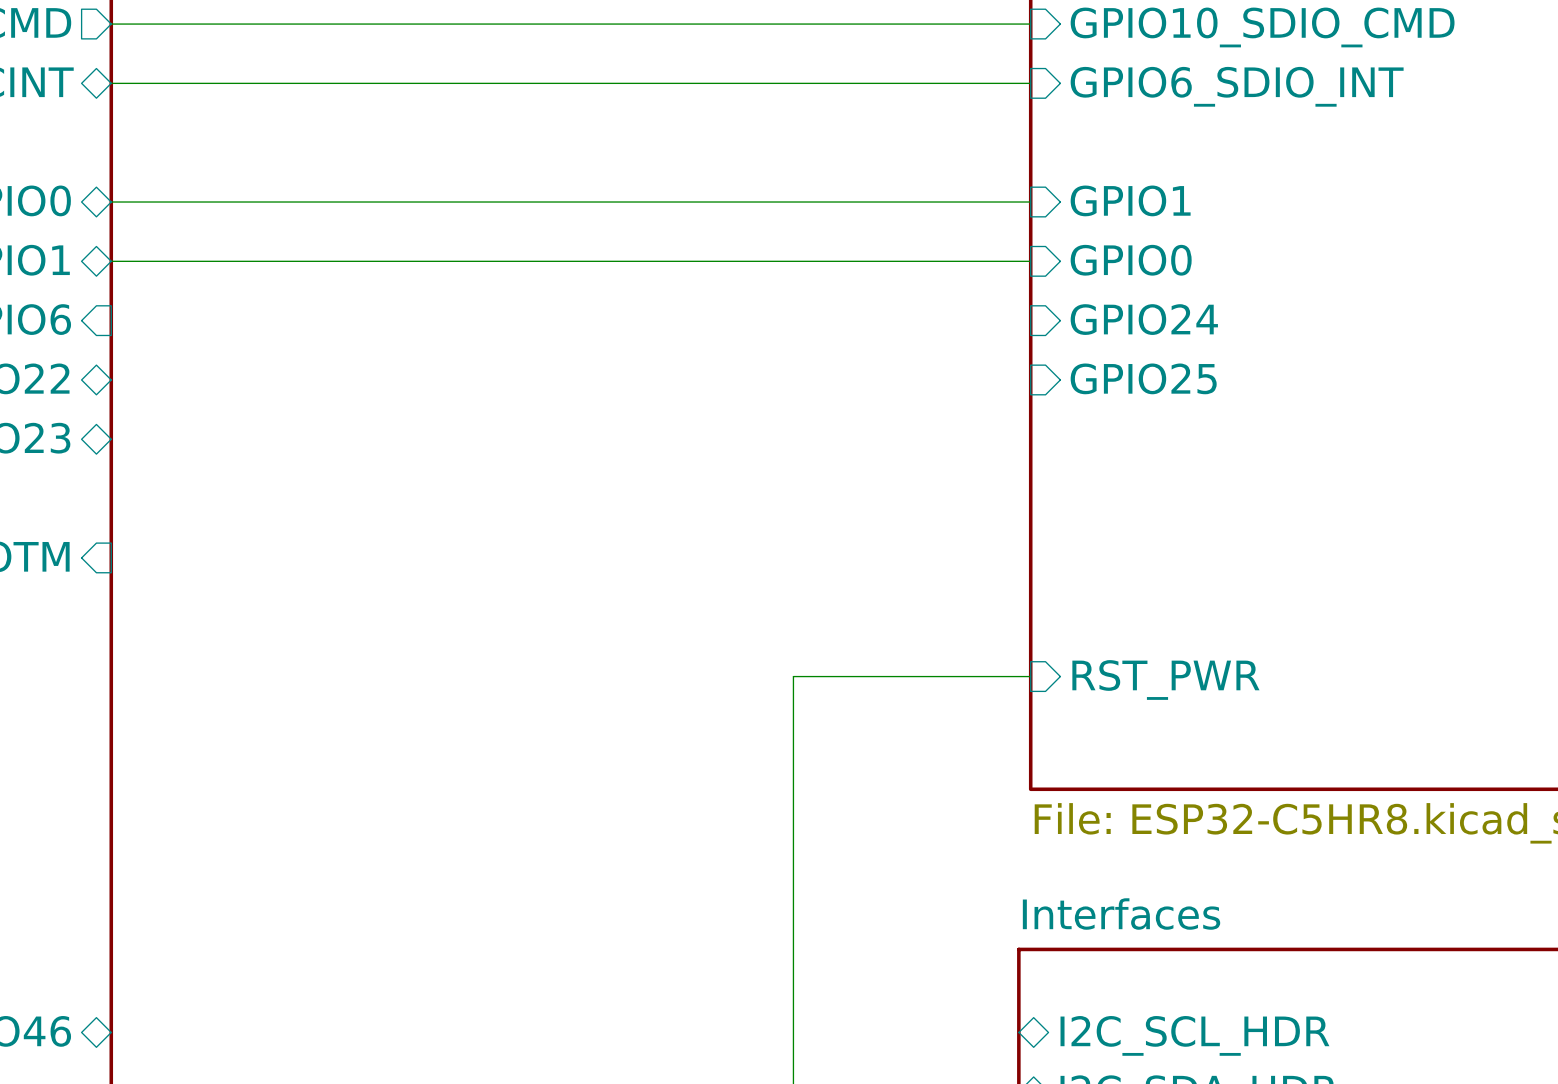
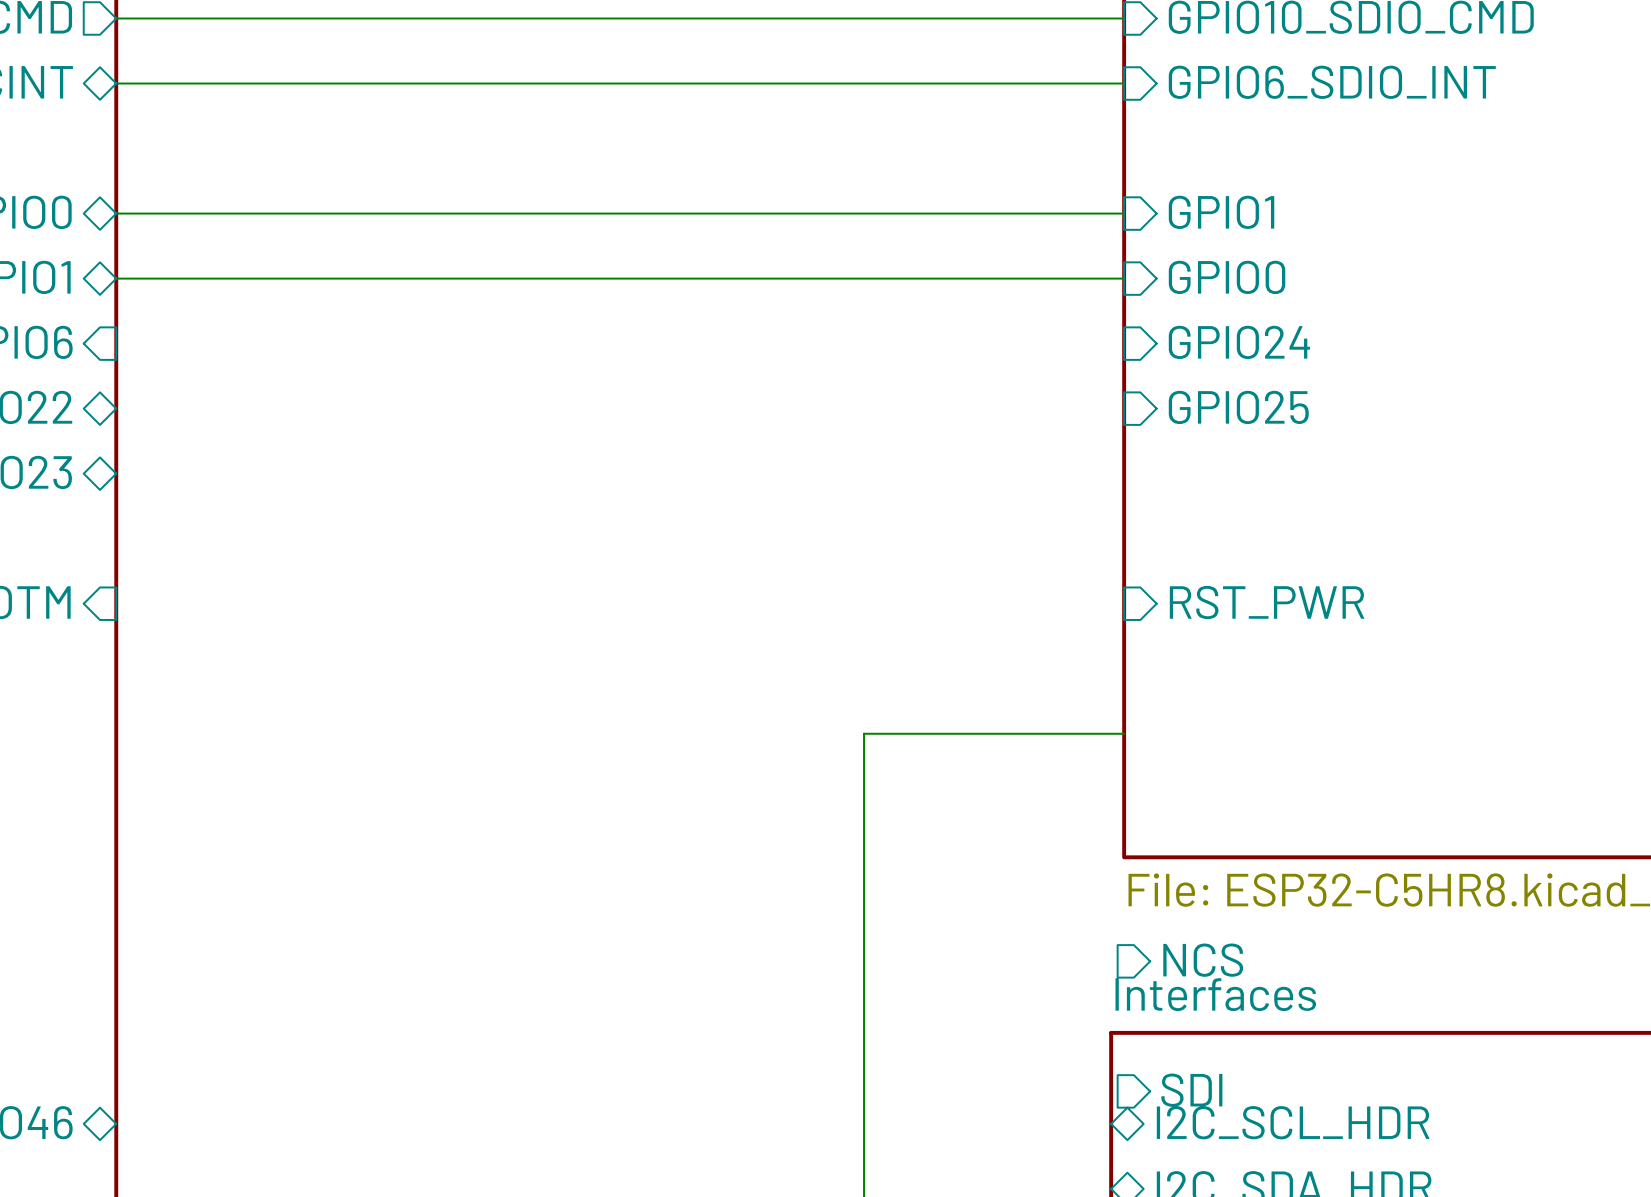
sheet pin position: RST_PWR (1165, 679) -> RST_PWR (1267, 602)
sheet pin: none -> NCS (1203, 960)
sheet pin: none -> SDI (1191, 1090)

